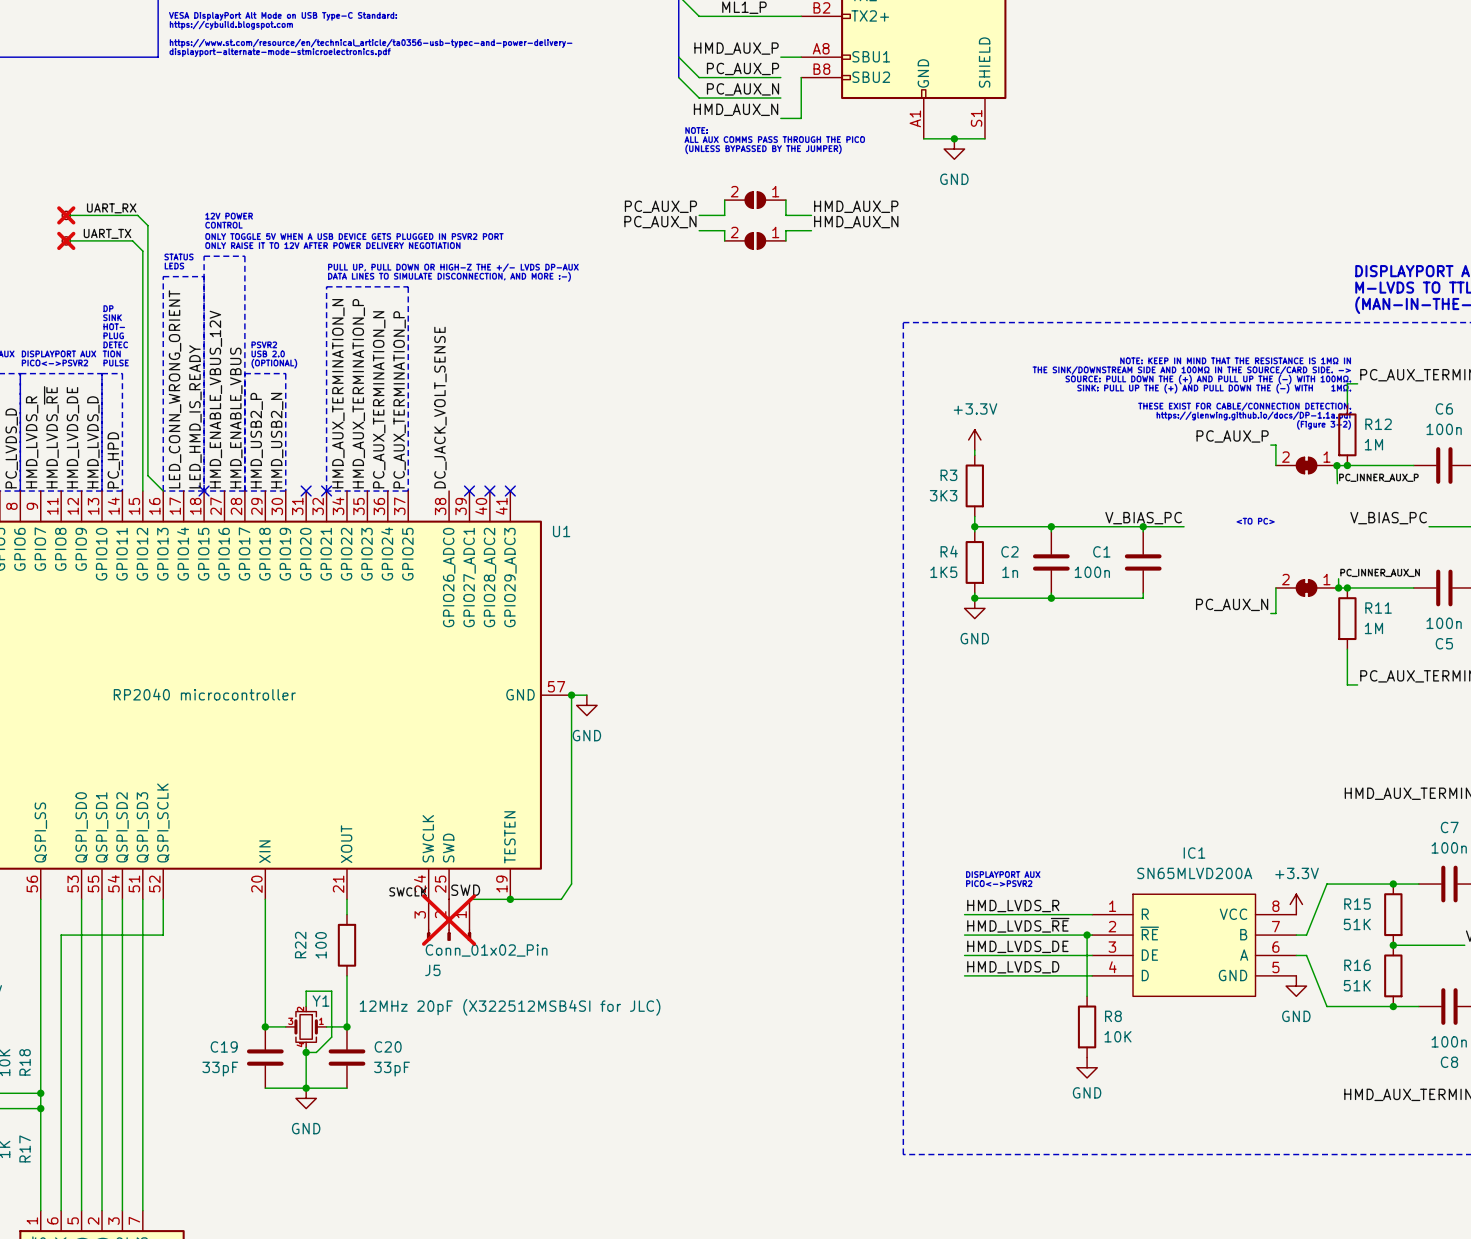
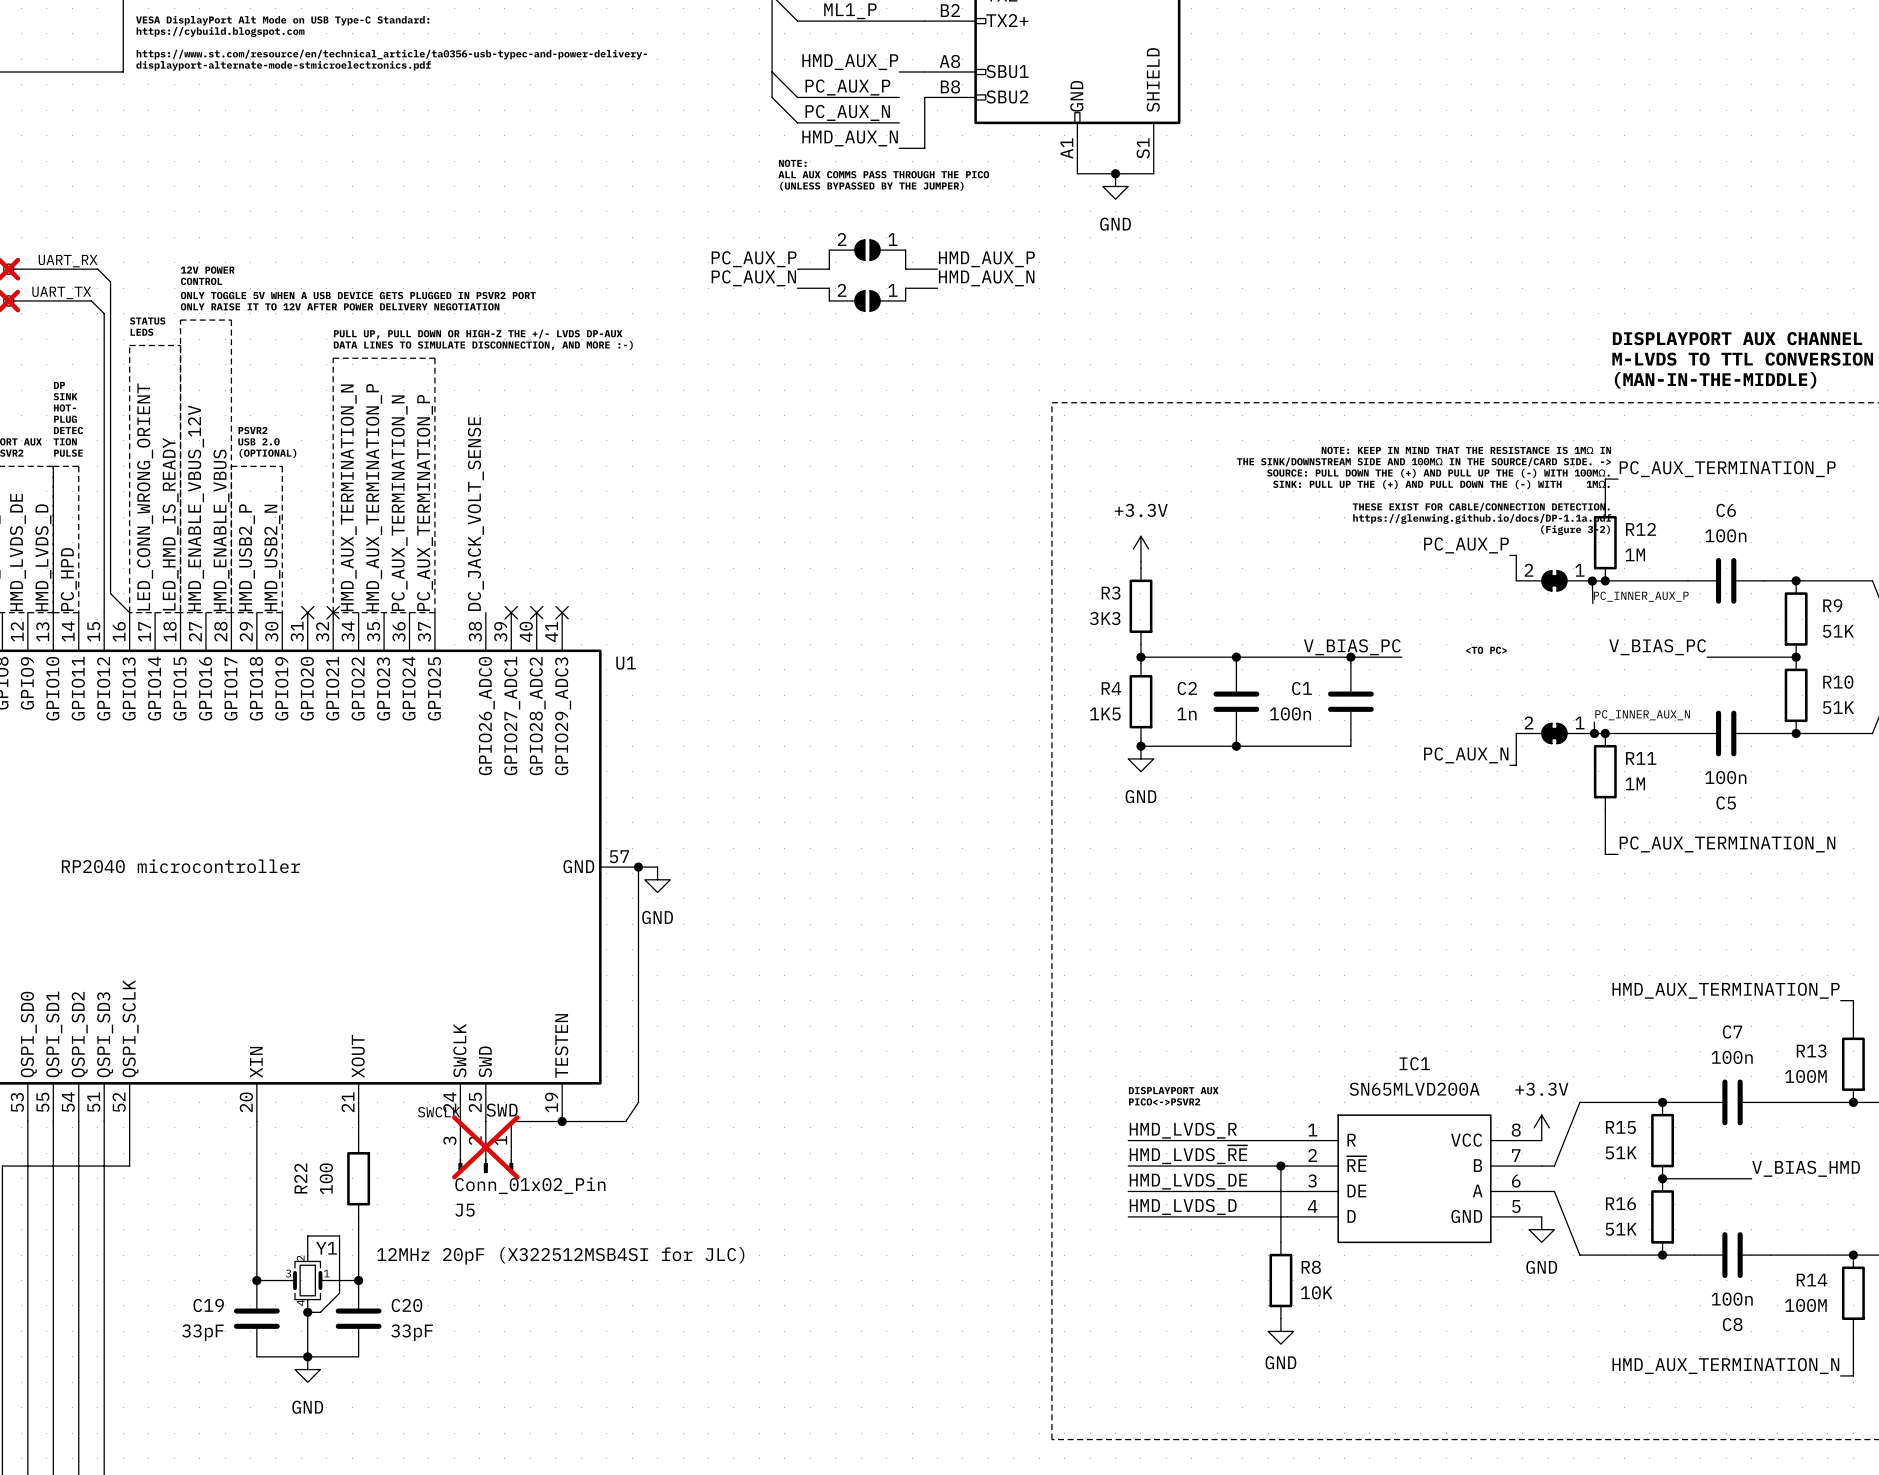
no-connect mark: (204, 491) -> none

